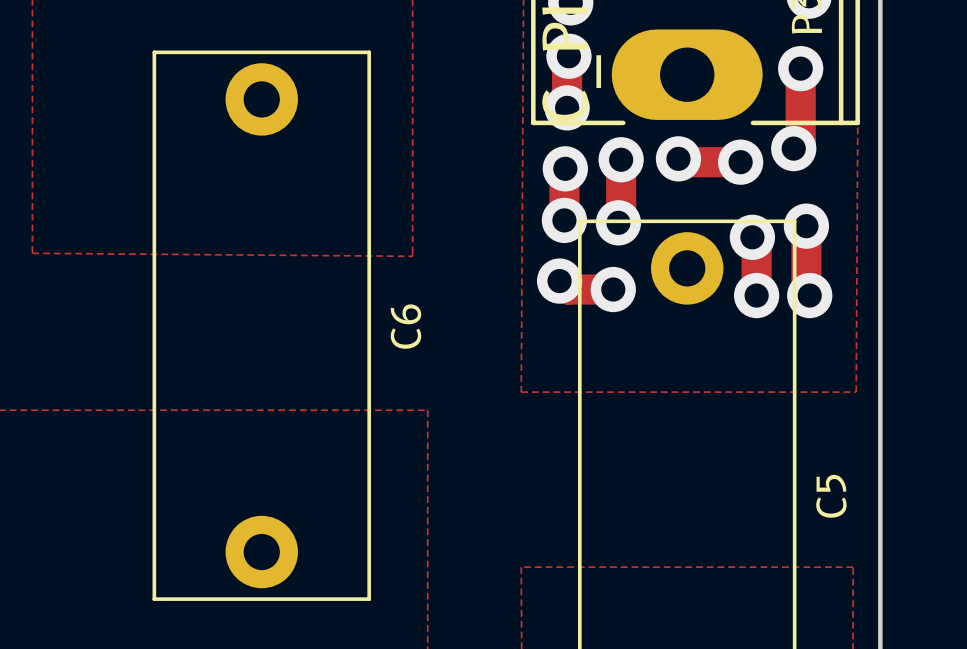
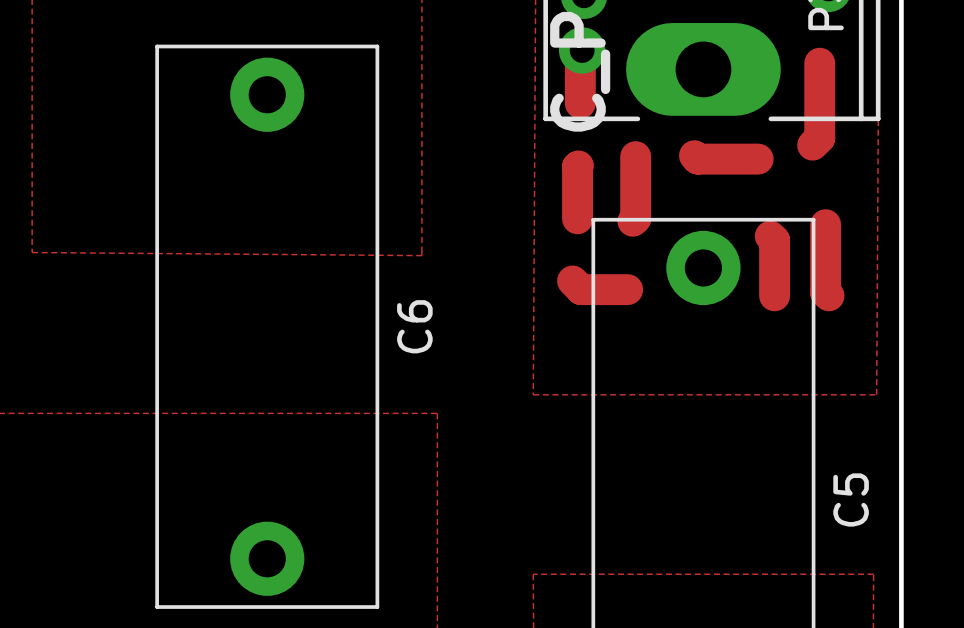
via: (800, 68) -> none
via: (567, 107) -> none
via: (793, 148) -> none
via: (678, 158) -> none
via: (621, 159) -> none
via: (740, 162) -> none
via: (565, 168) -> none
via: (564, 220) -> none
via: (618, 222) -> none
via: (806, 226) -> none
via: (752, 237) -> none
via: (559, 281) -> none
via: (613, 289) -> none
via: (756, 295) -> none
via: (809, 295) -> none

